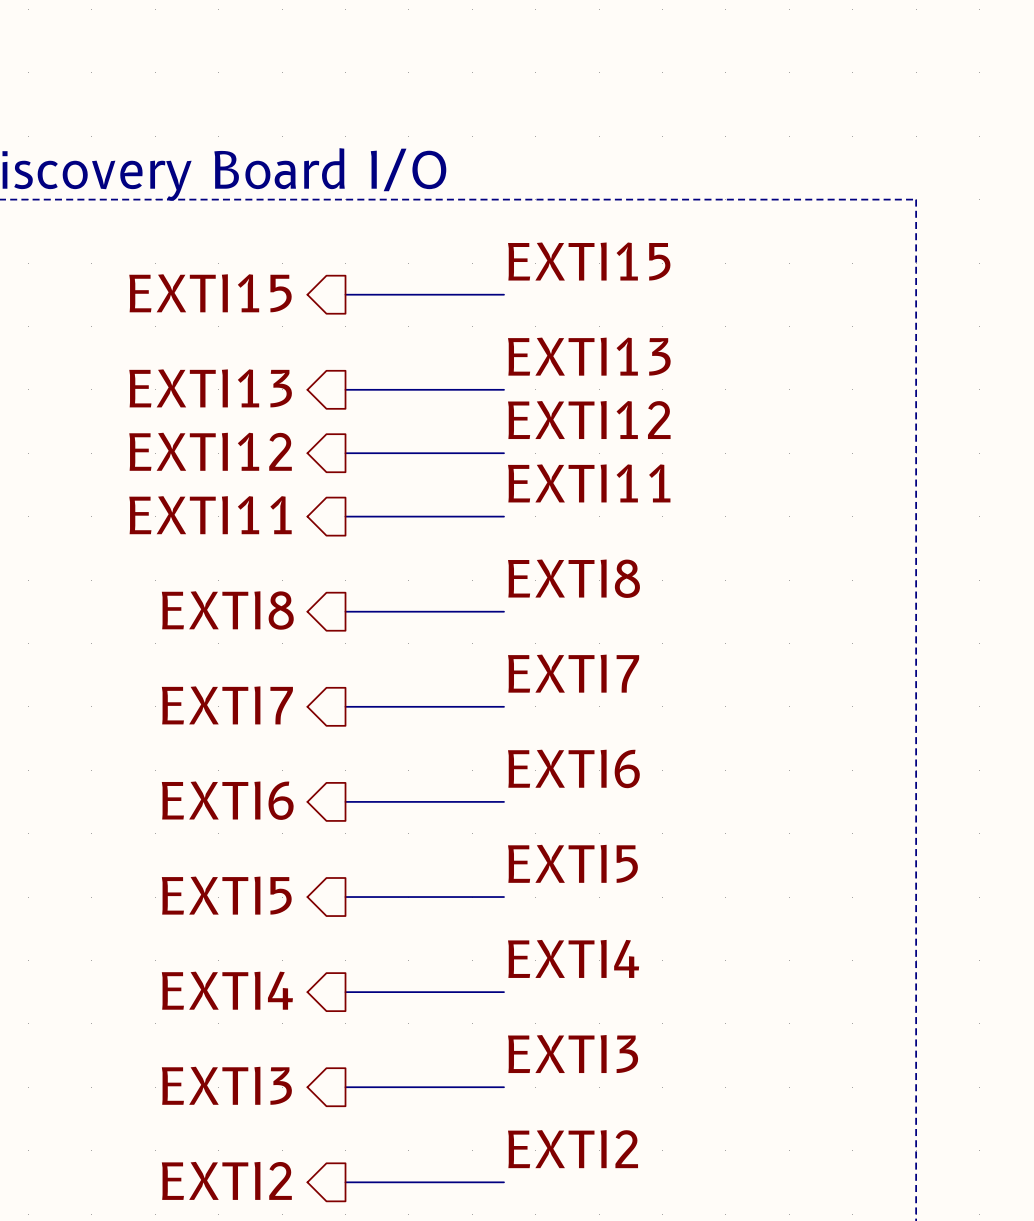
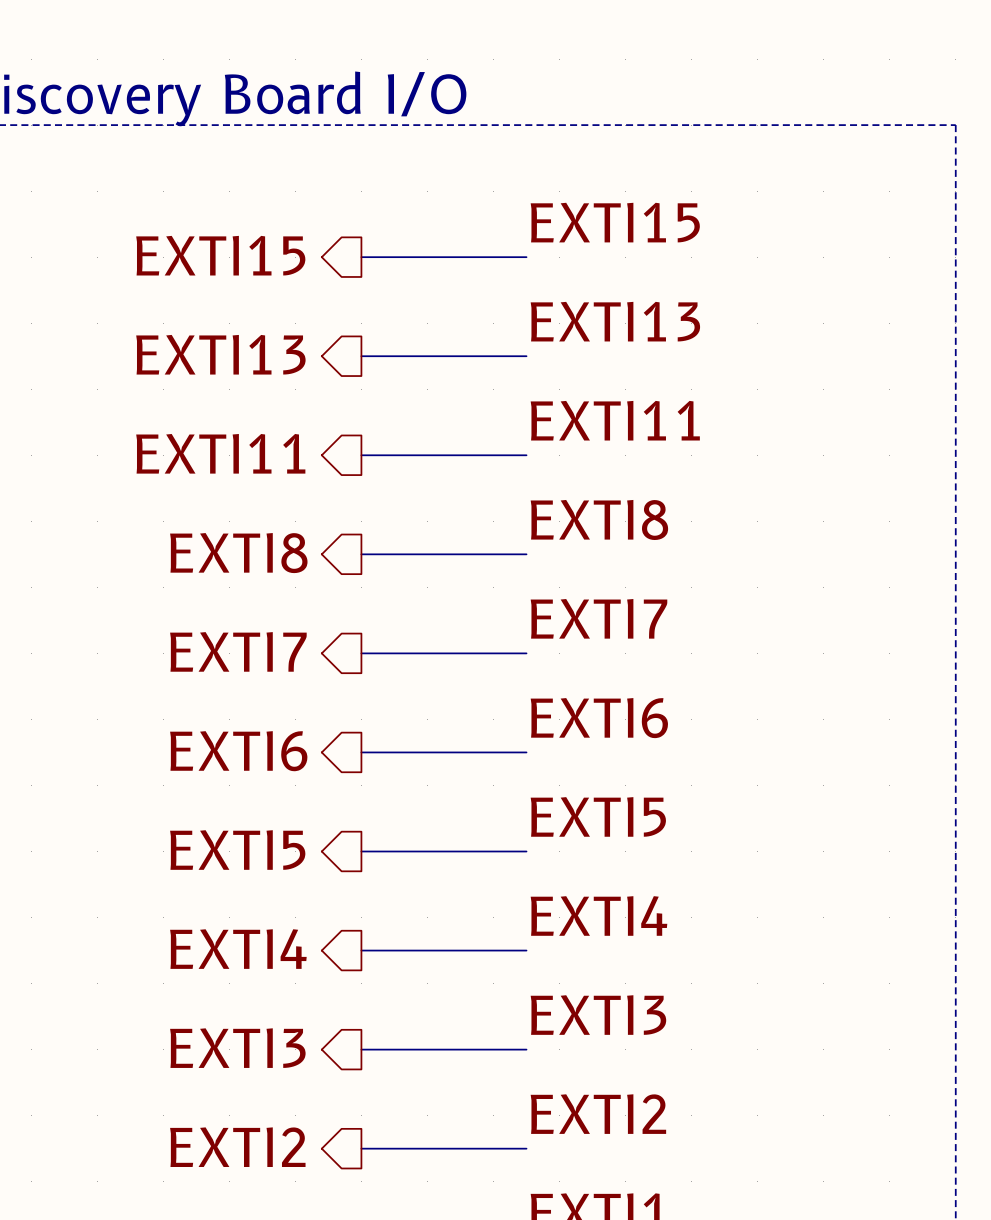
label position: EXTI15 (589, 261) -> EXTI15 (615, 222)
hierarchical label position: EXTI15 (210, 293) -> EXTI15 (220, 255)
wire: (345, 294) (504, 294) -> (361, 257) (526, 257)
label position: EXTI13 (589, 356) -> EXTI13 (615, 321)
hierarchical label position: EXTI13 (210, 388) -> EXTI13 (220, 354)
wire: (345, 389) (504, 389) -> (361, 356) (526, 356)
label: EXTI12 (589, 420) -> none
hierarchical label: EXTI12 (210, 451) -> none
wire: (345, 453) (504, 453) -> none

